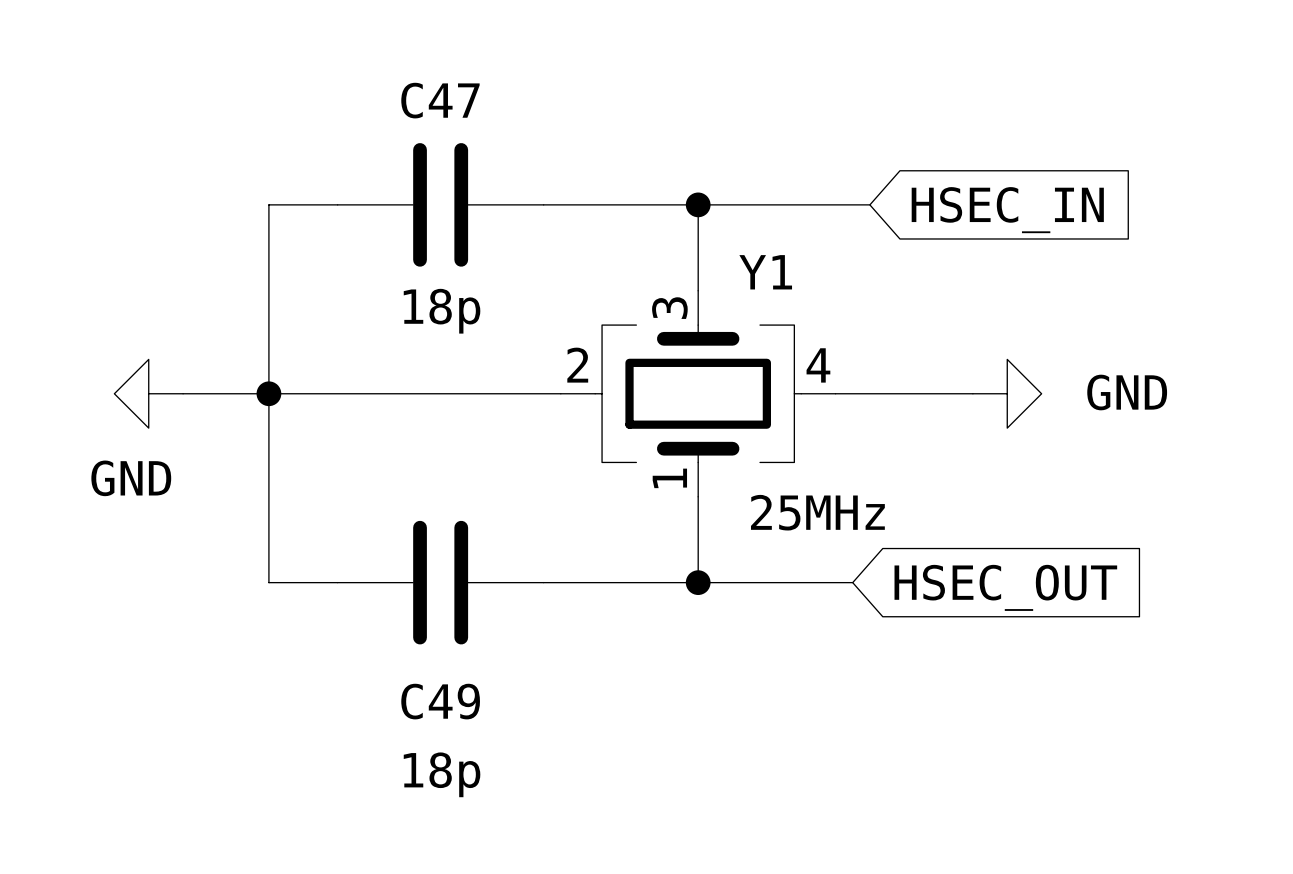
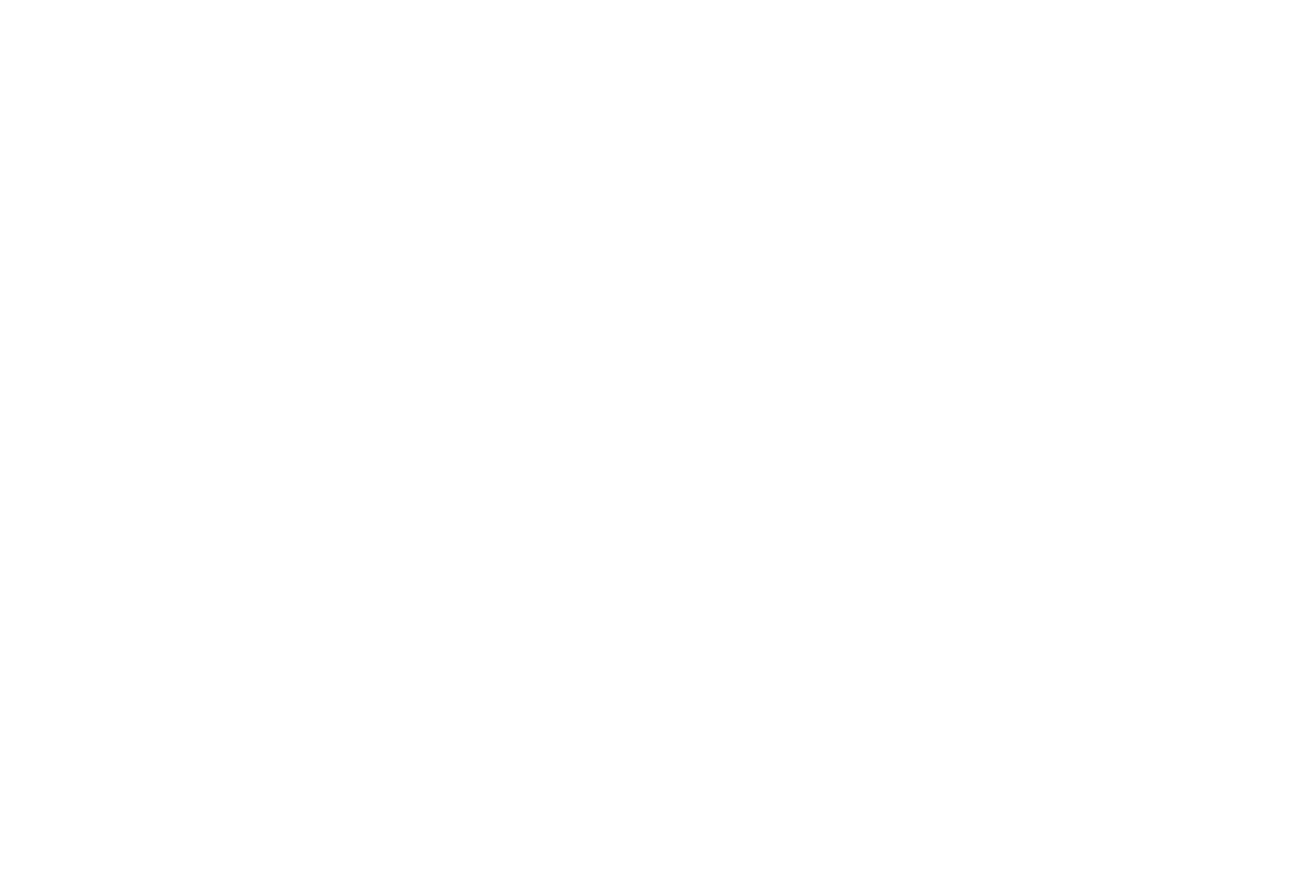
wire: (337, 204) (268, 204) (268, 582) (337, 582) -> none
C47: 18p (440, 204) -> none
wire: (543, 204) (869, 204) -> none
wire: (698, 204) (698, 290) -> none
junction: (698, 204) -> none
global label: HSEC_IN (1007, 210) -> none
power symbol: GND (148, 393) -> none
wire: (183, 393) (560, 393) -> none
junction: (268, 393) -> none
Y1: 25MHz (698, 393) -> none
wire: (835, 393) (972, 393) -> none
power symbol: GND (1007, 393) -> none
wire: (698, 496) (698, 582) -> none
C49: 18p (440, 582) -> none
wire: (543, 582) (852, 582) -> none
junction: (698, 582) -> none
global label: HSEC_OUT (1005, 587) -> none

